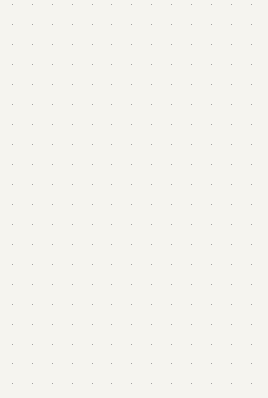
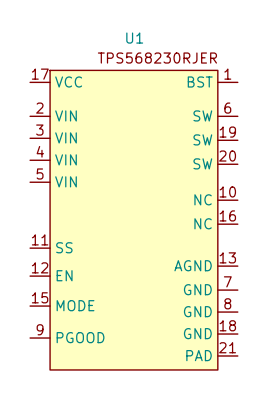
U1: none -> (133, 220)

